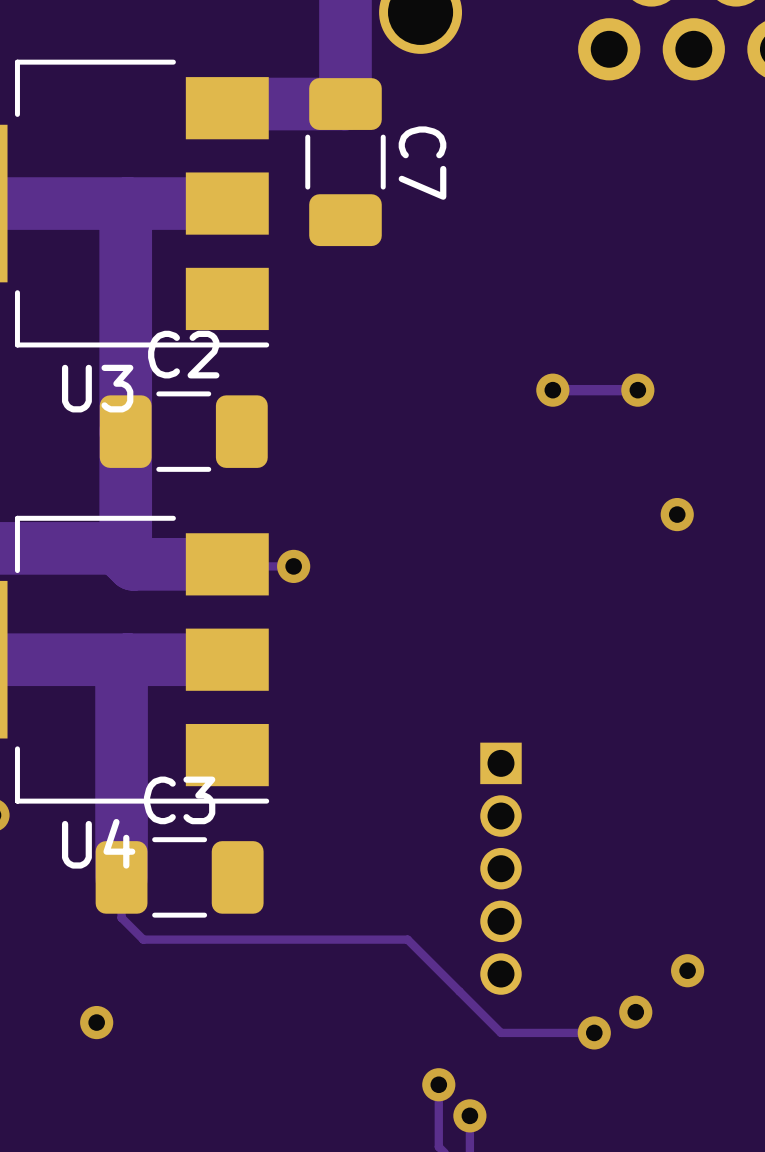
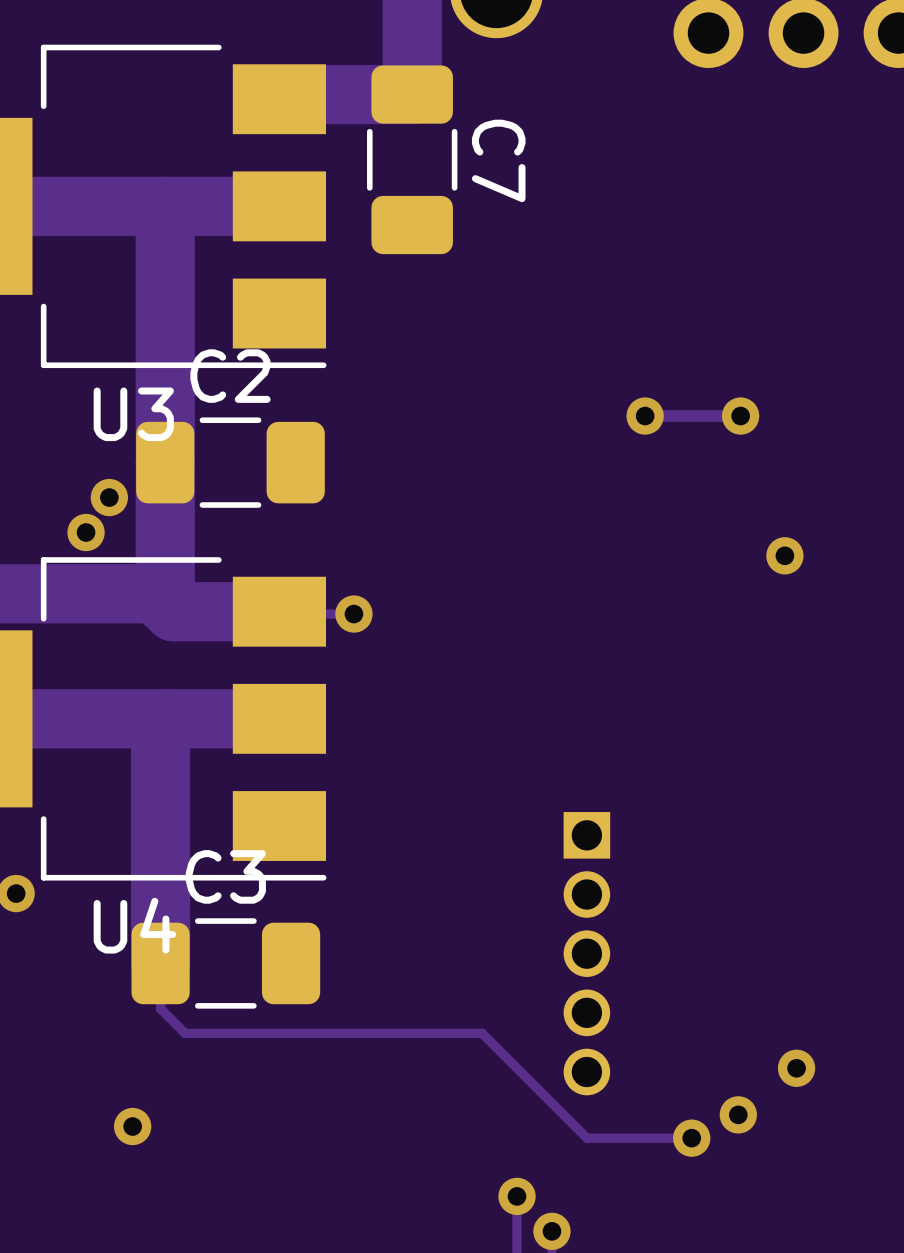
via: none -> (109, 497)
via: none -> (86, 532)

